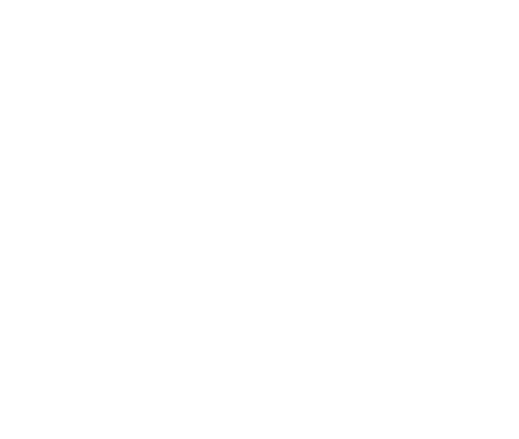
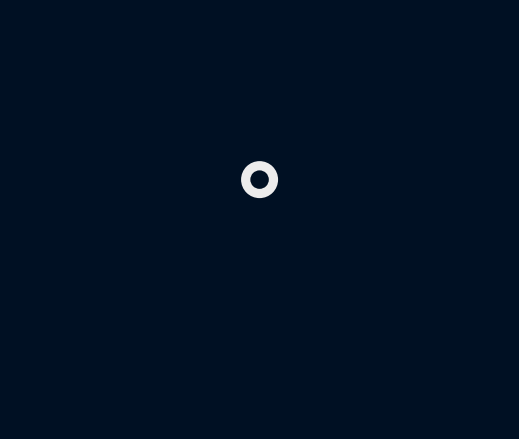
via: none -> (259, 179)

